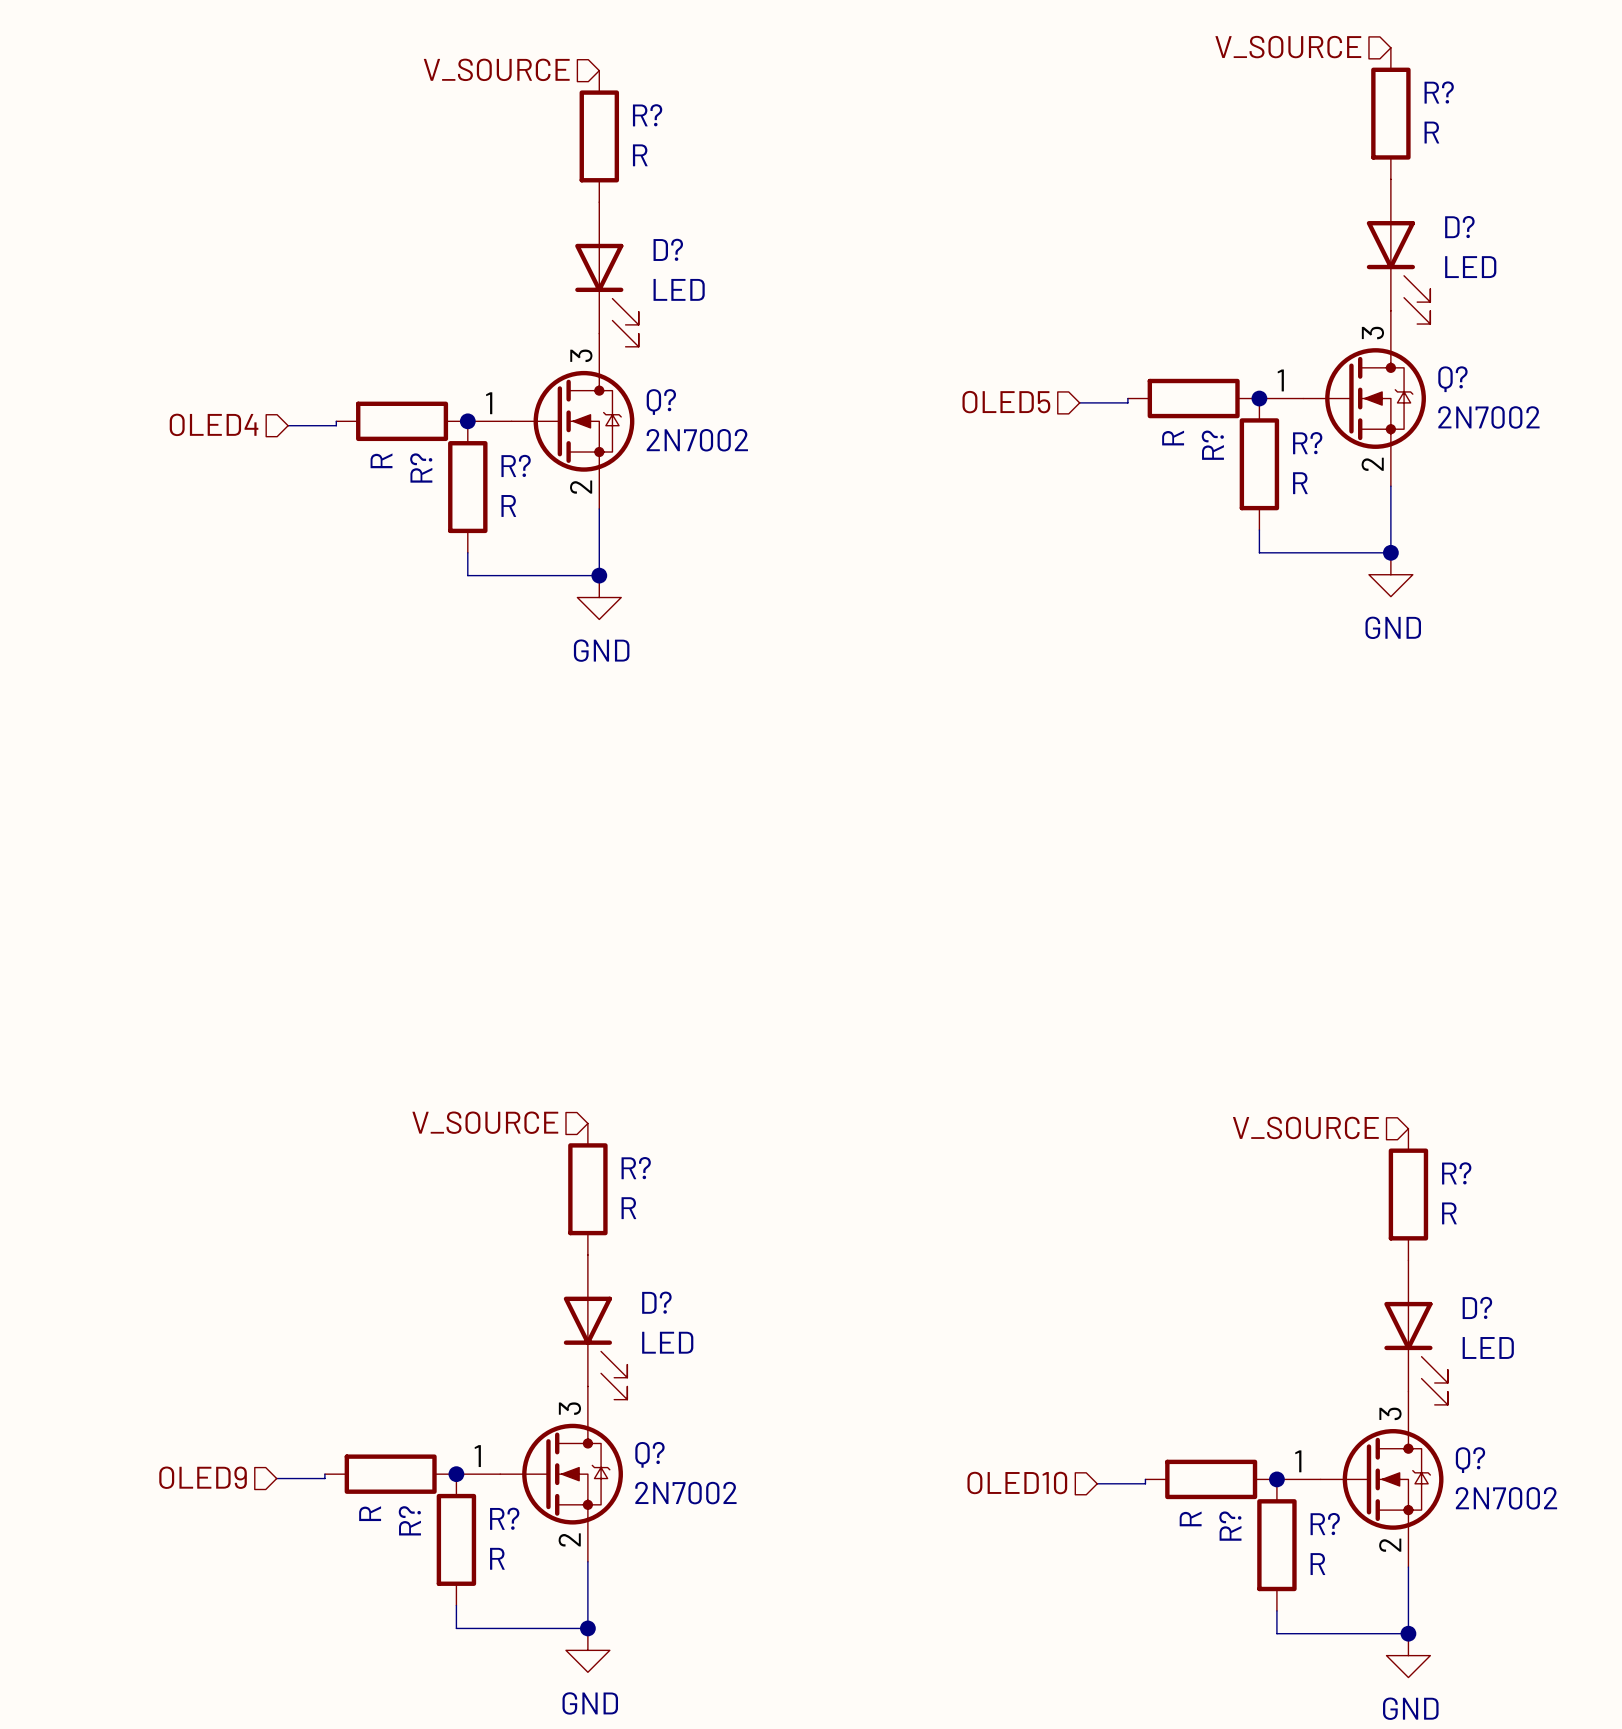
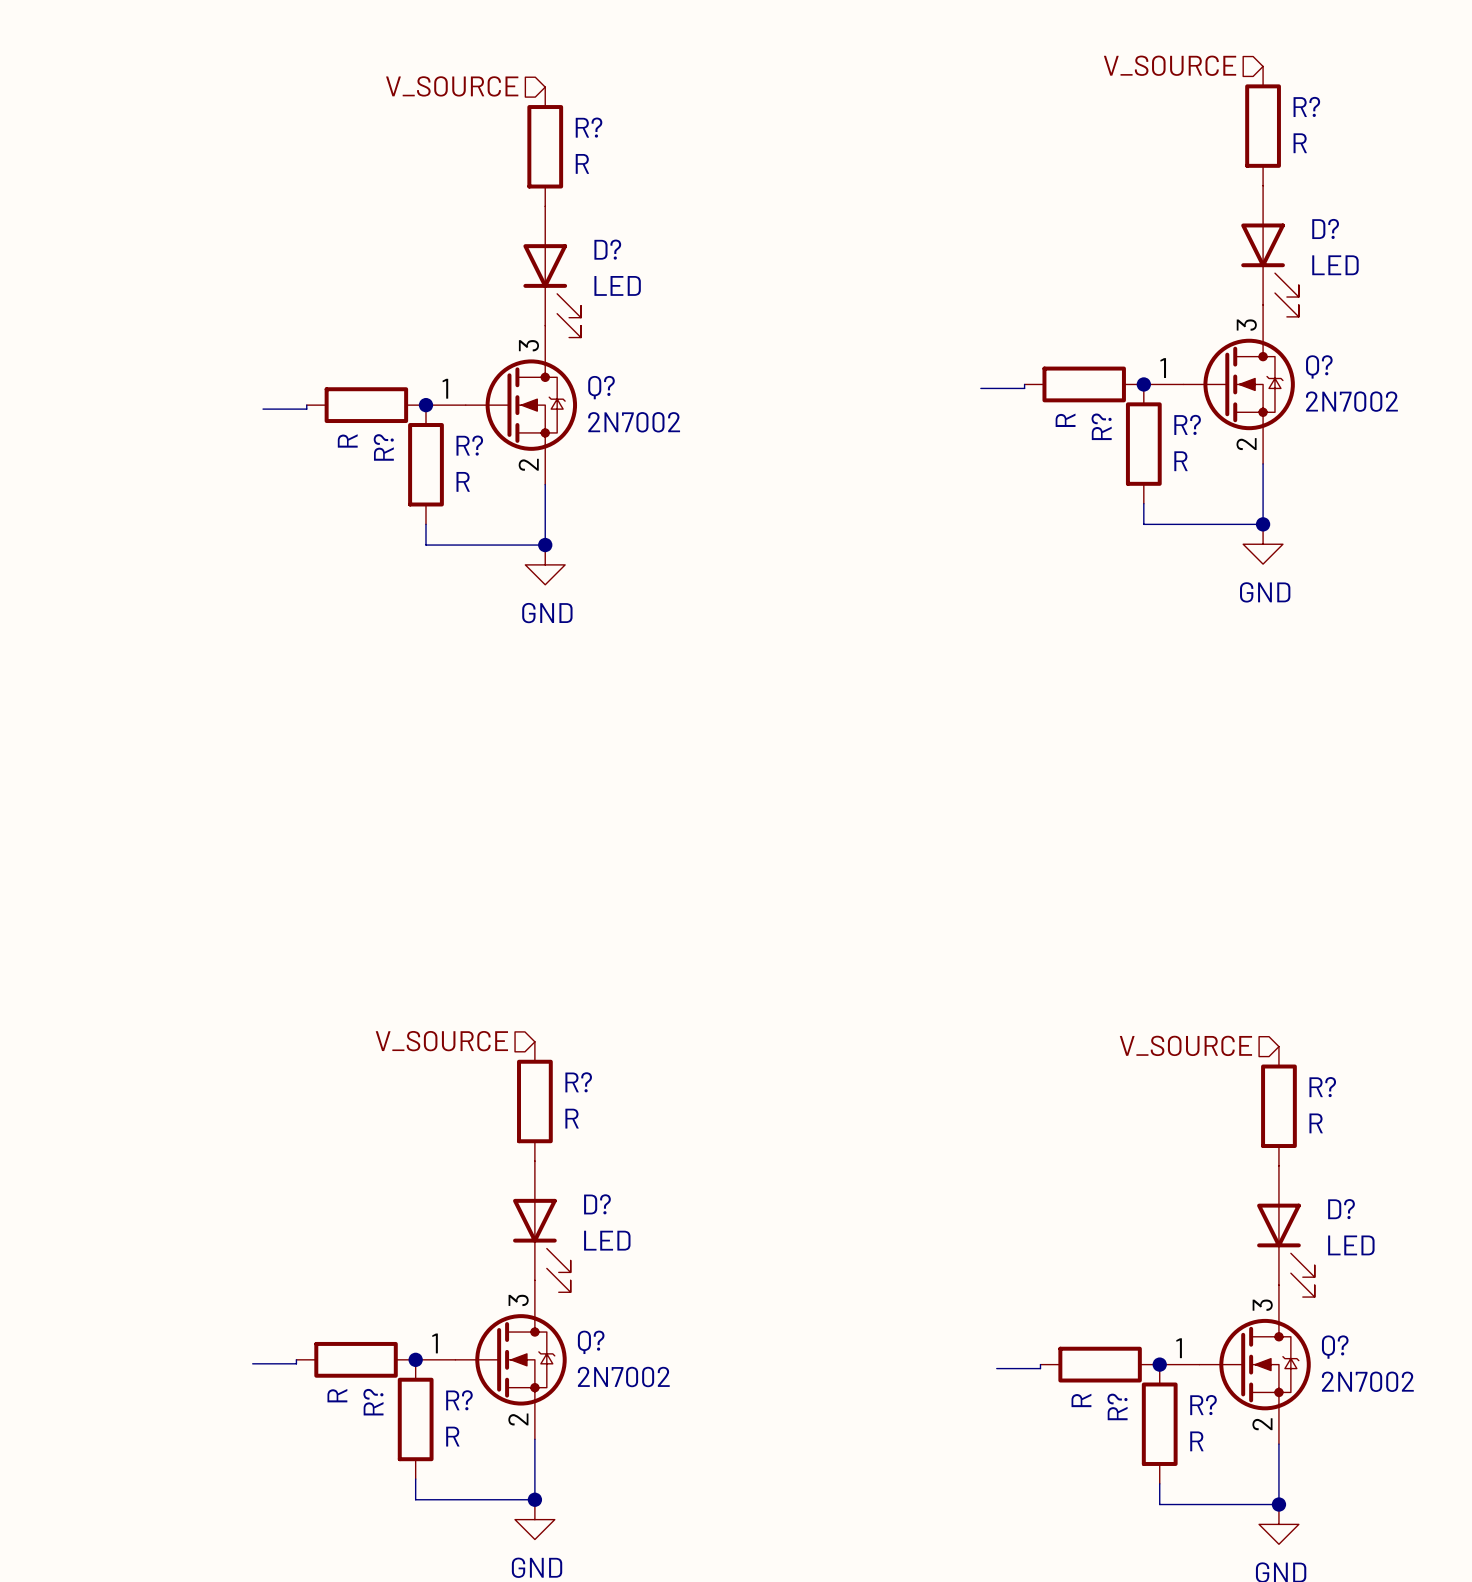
hierarchical label: OLED5 (1006, 402) -> none
hierarchical label: OLED4 (214, 424) -> none
hierarchical label: OLED9 (203, 1477) -> none
hierarchical label: OLED10 (1017, 1482) -> none

